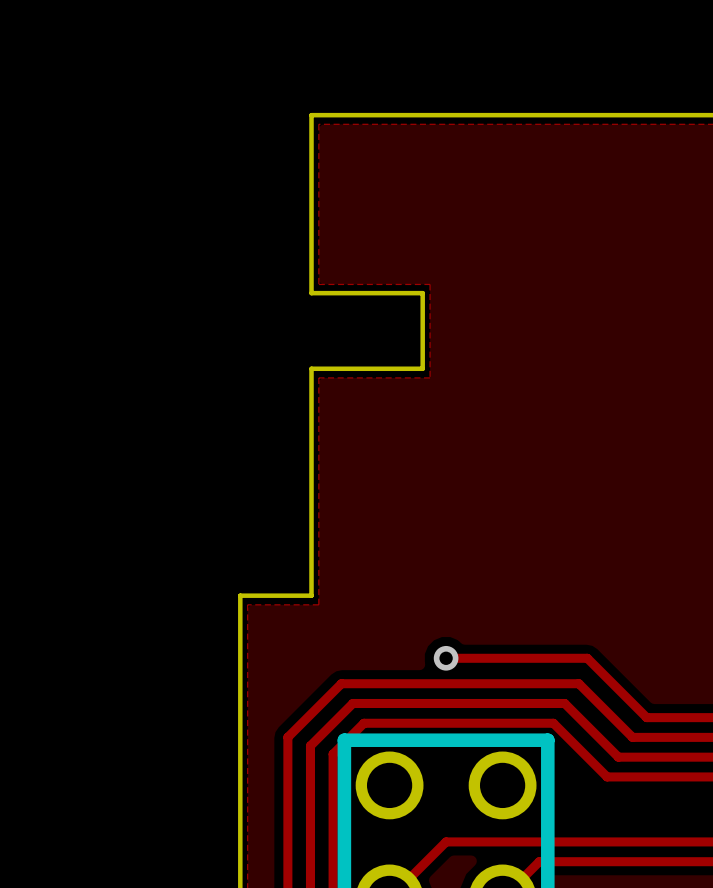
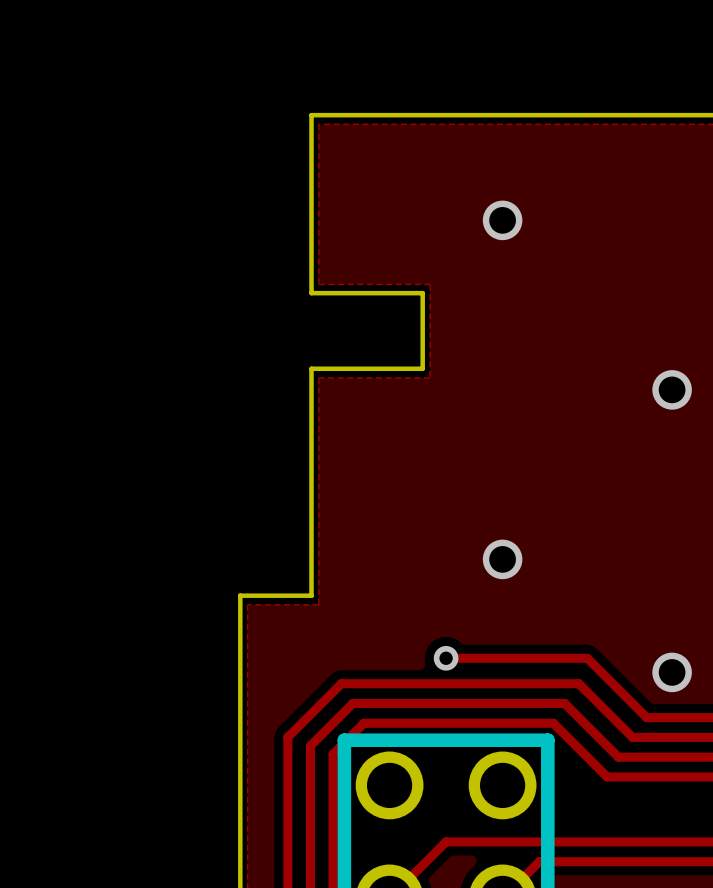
via: none -> (502, 220)
via: none -> (672, 389)
via: none -> (502, 559)
via: none -> (672, 672)

